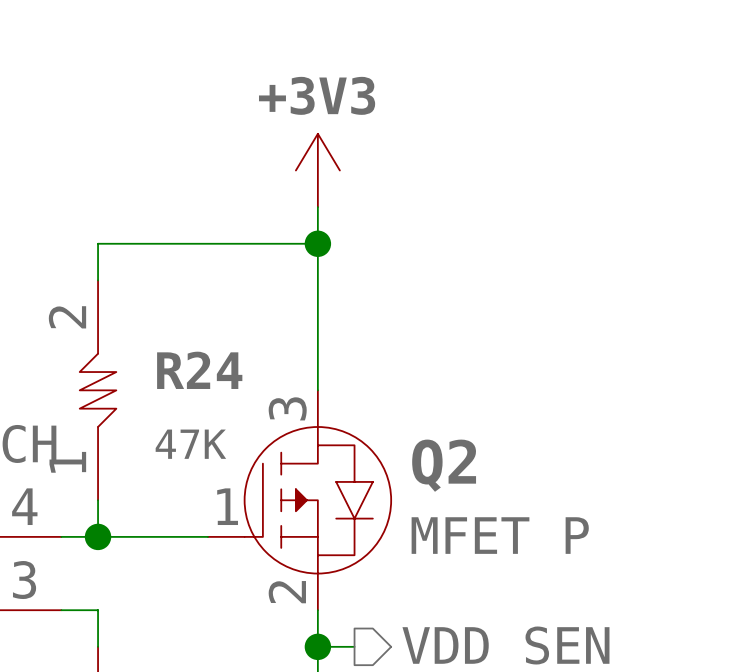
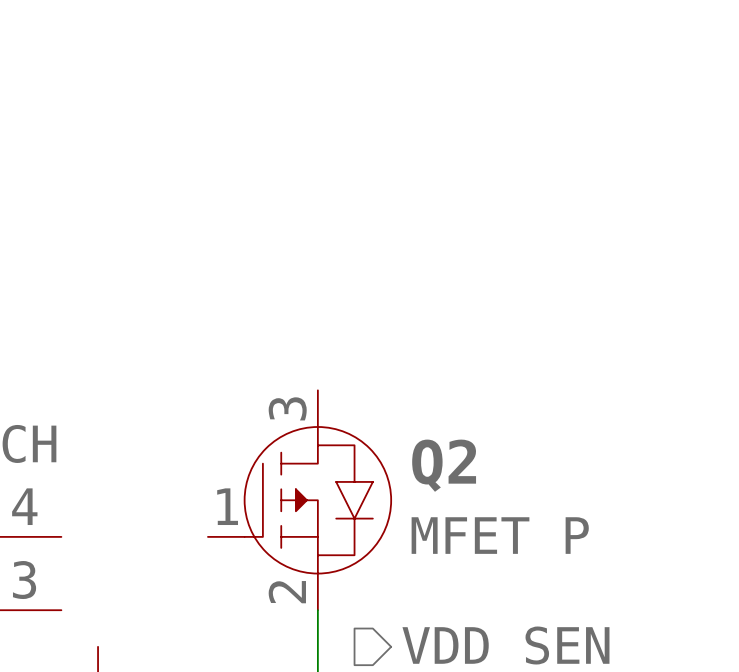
power symbol: +3V3 (317, 170) -> none
wire: (317, 207) (317, 390) -> none
wire: (317, 243) (98, 243) (98, 280) -> none
junction: (317, 243) -> none
R24: 47K (98, 390) -> none
wire: (98, 500) (98, 536) -> none
wire: (61, 536) (207, 536) -> none
junction: (98, 536) -> none
wire: (61, 610) (98, 610) (98, 646) -> none
wire: (317, 646) (354, 646) -> none
junction: (317, 646) -> none

